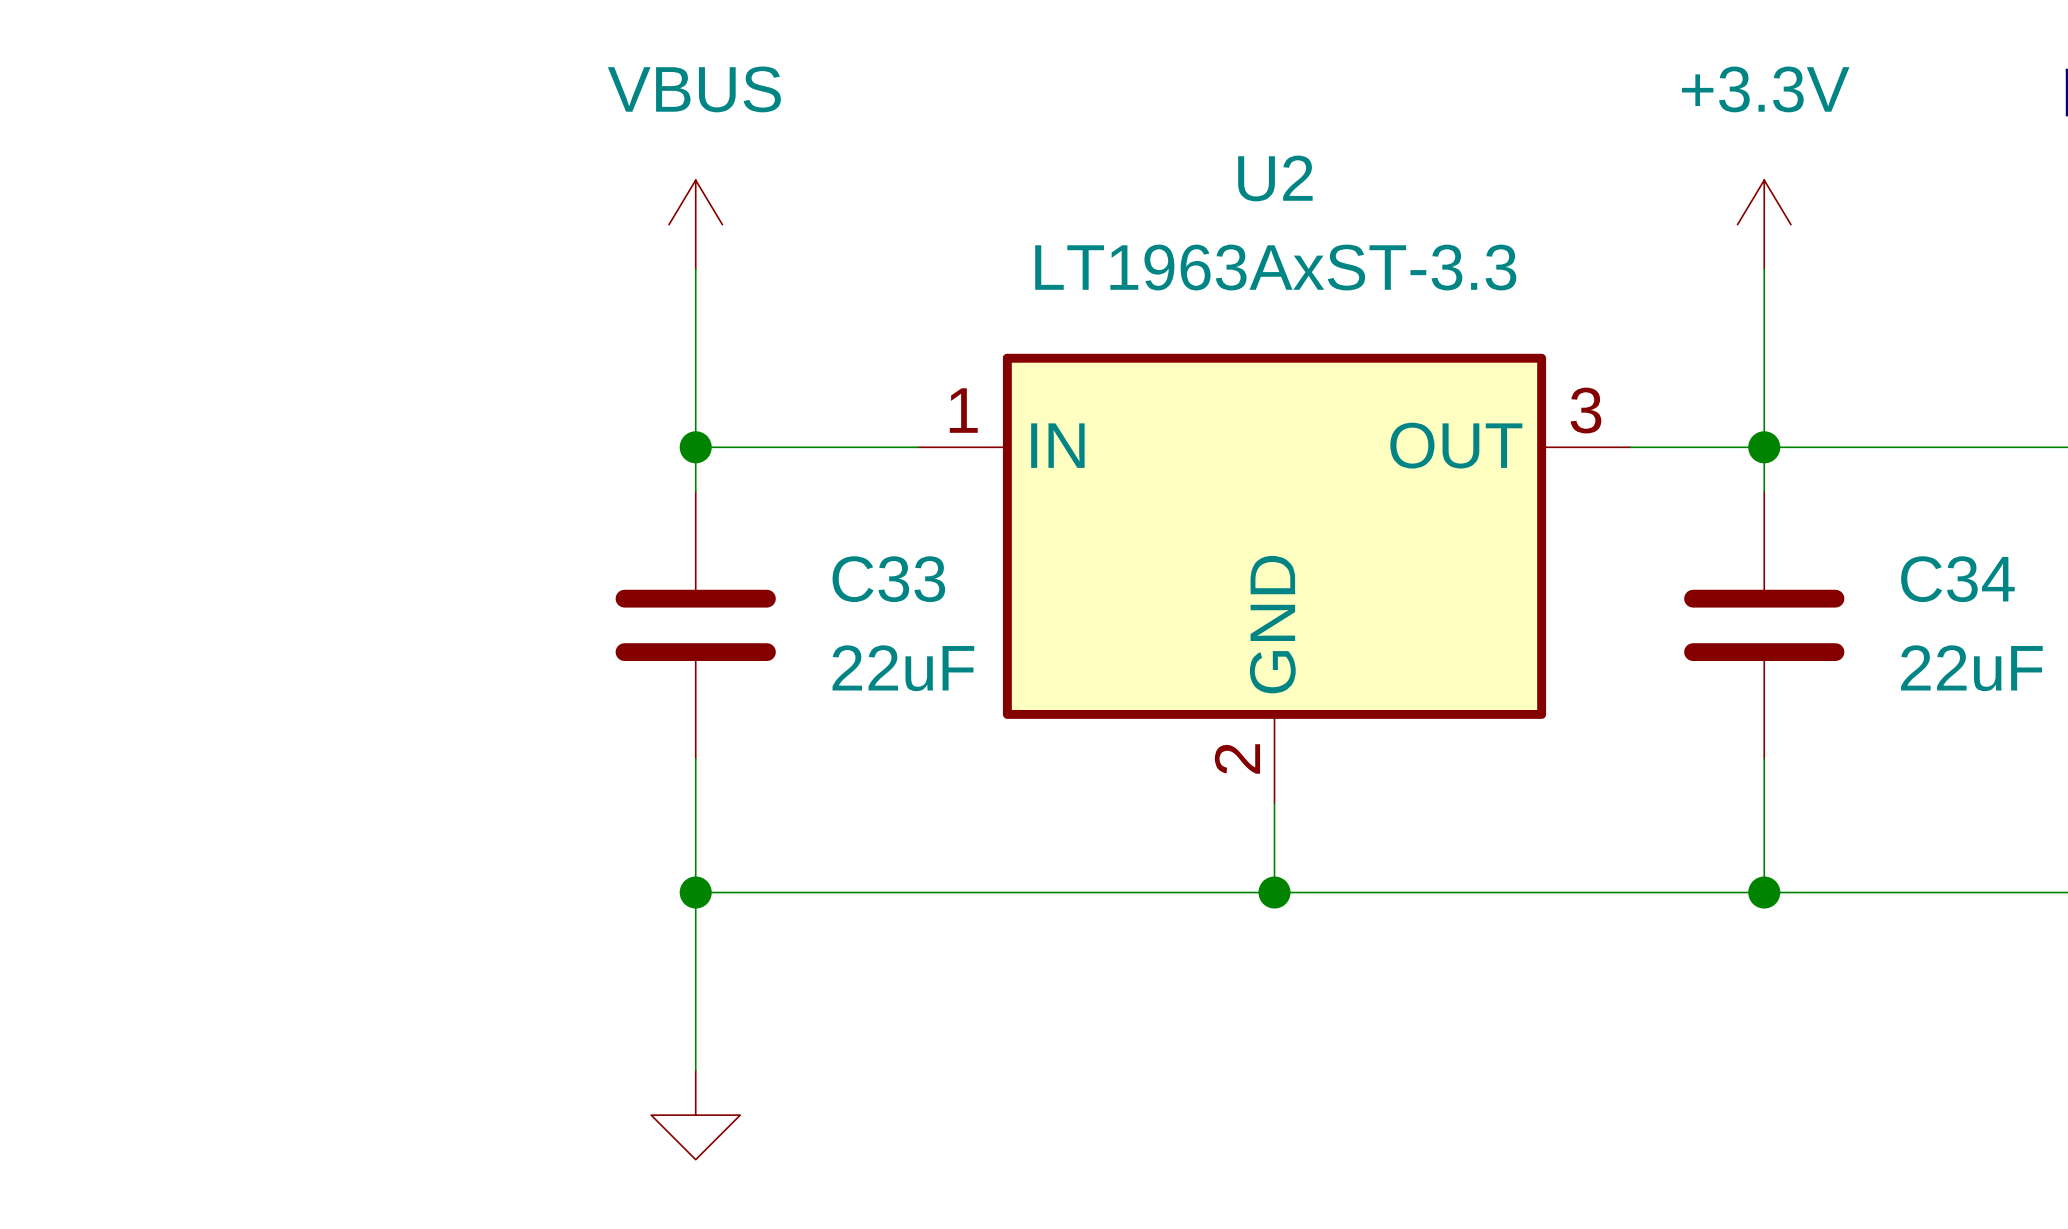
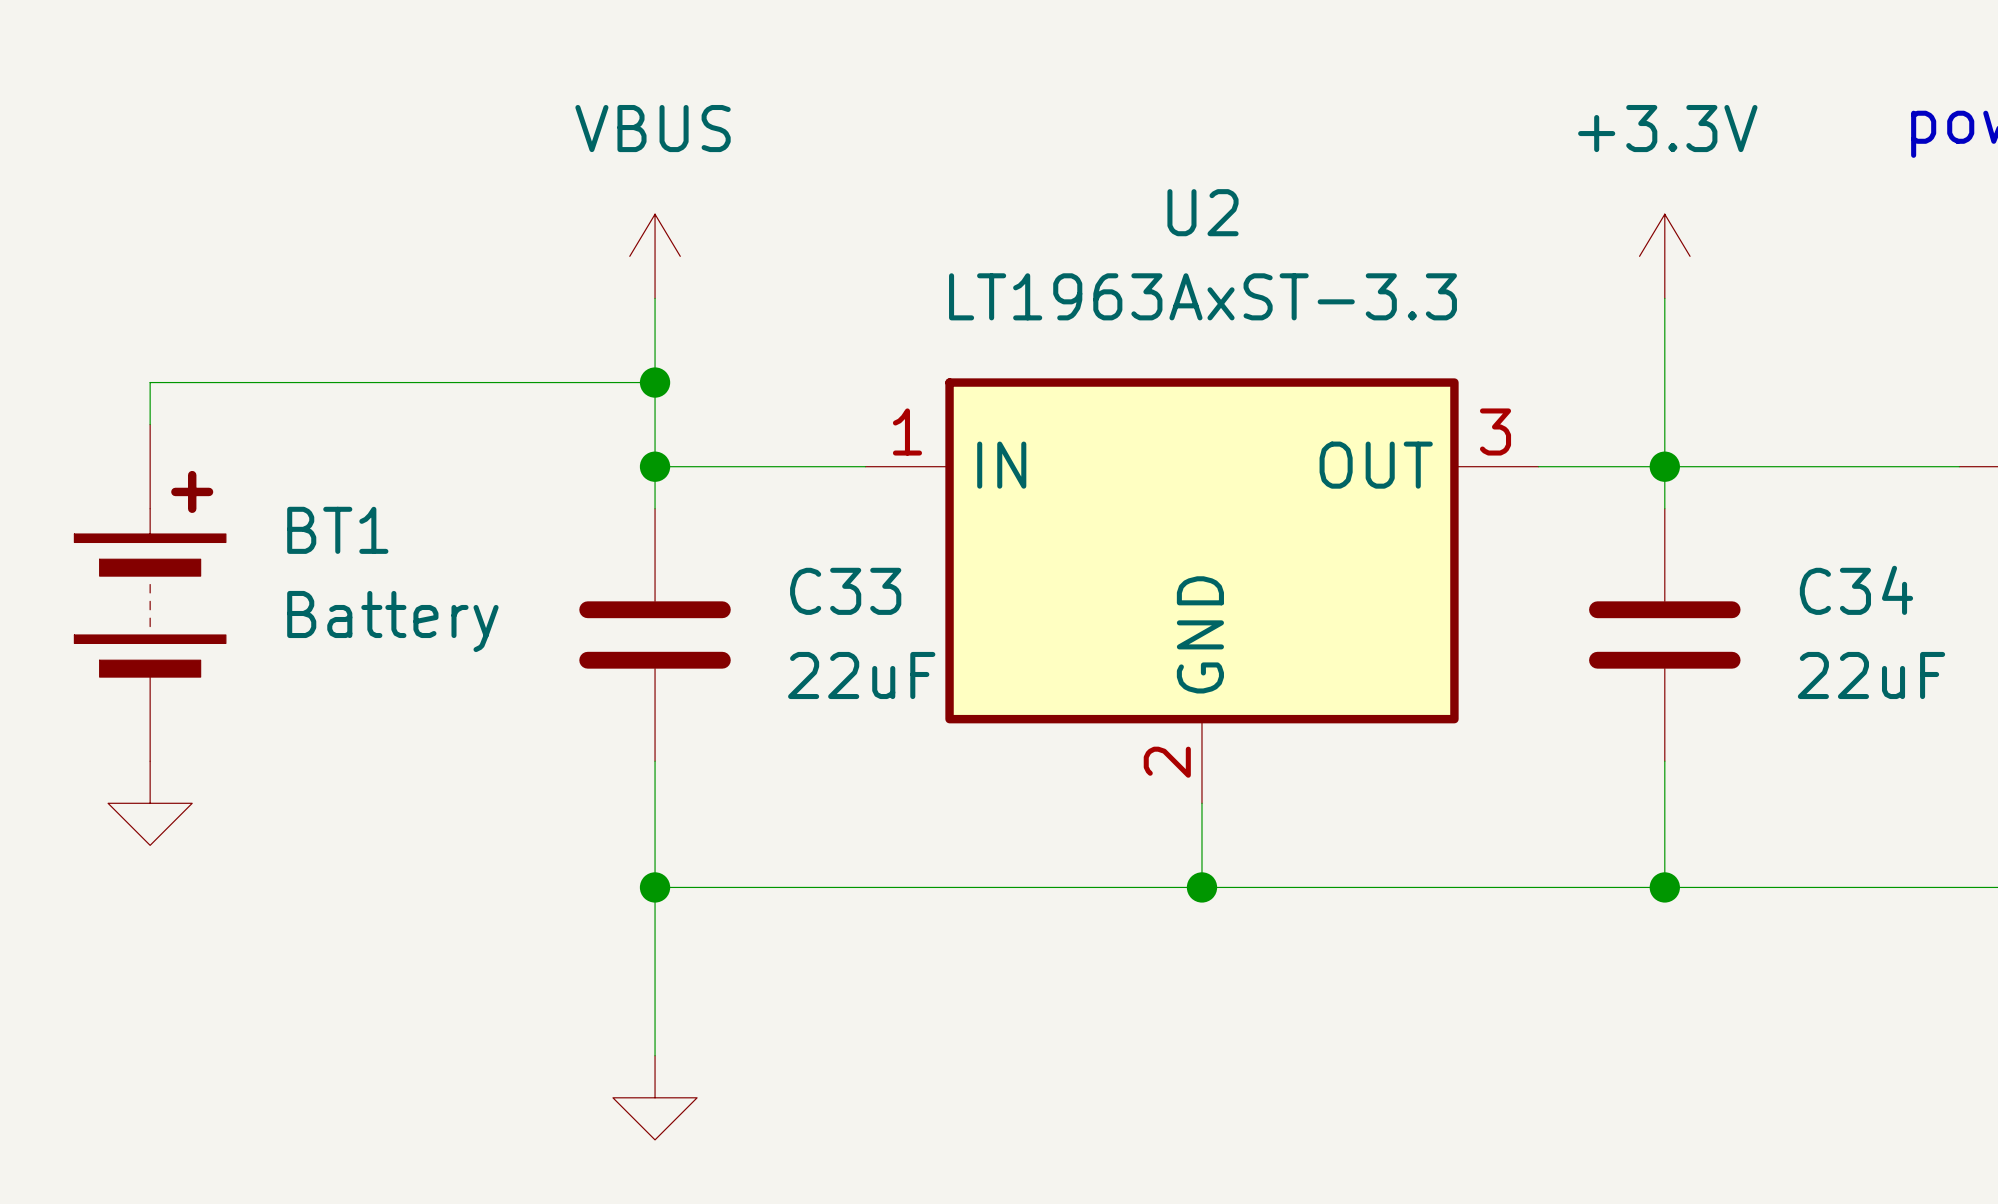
wire: none -> (655, 382) (150, 382) (150, 424)
junction: none -> (655, 382)
BT1: none -> Battery (150, 592)
power symbol: none -> (150, 803)

